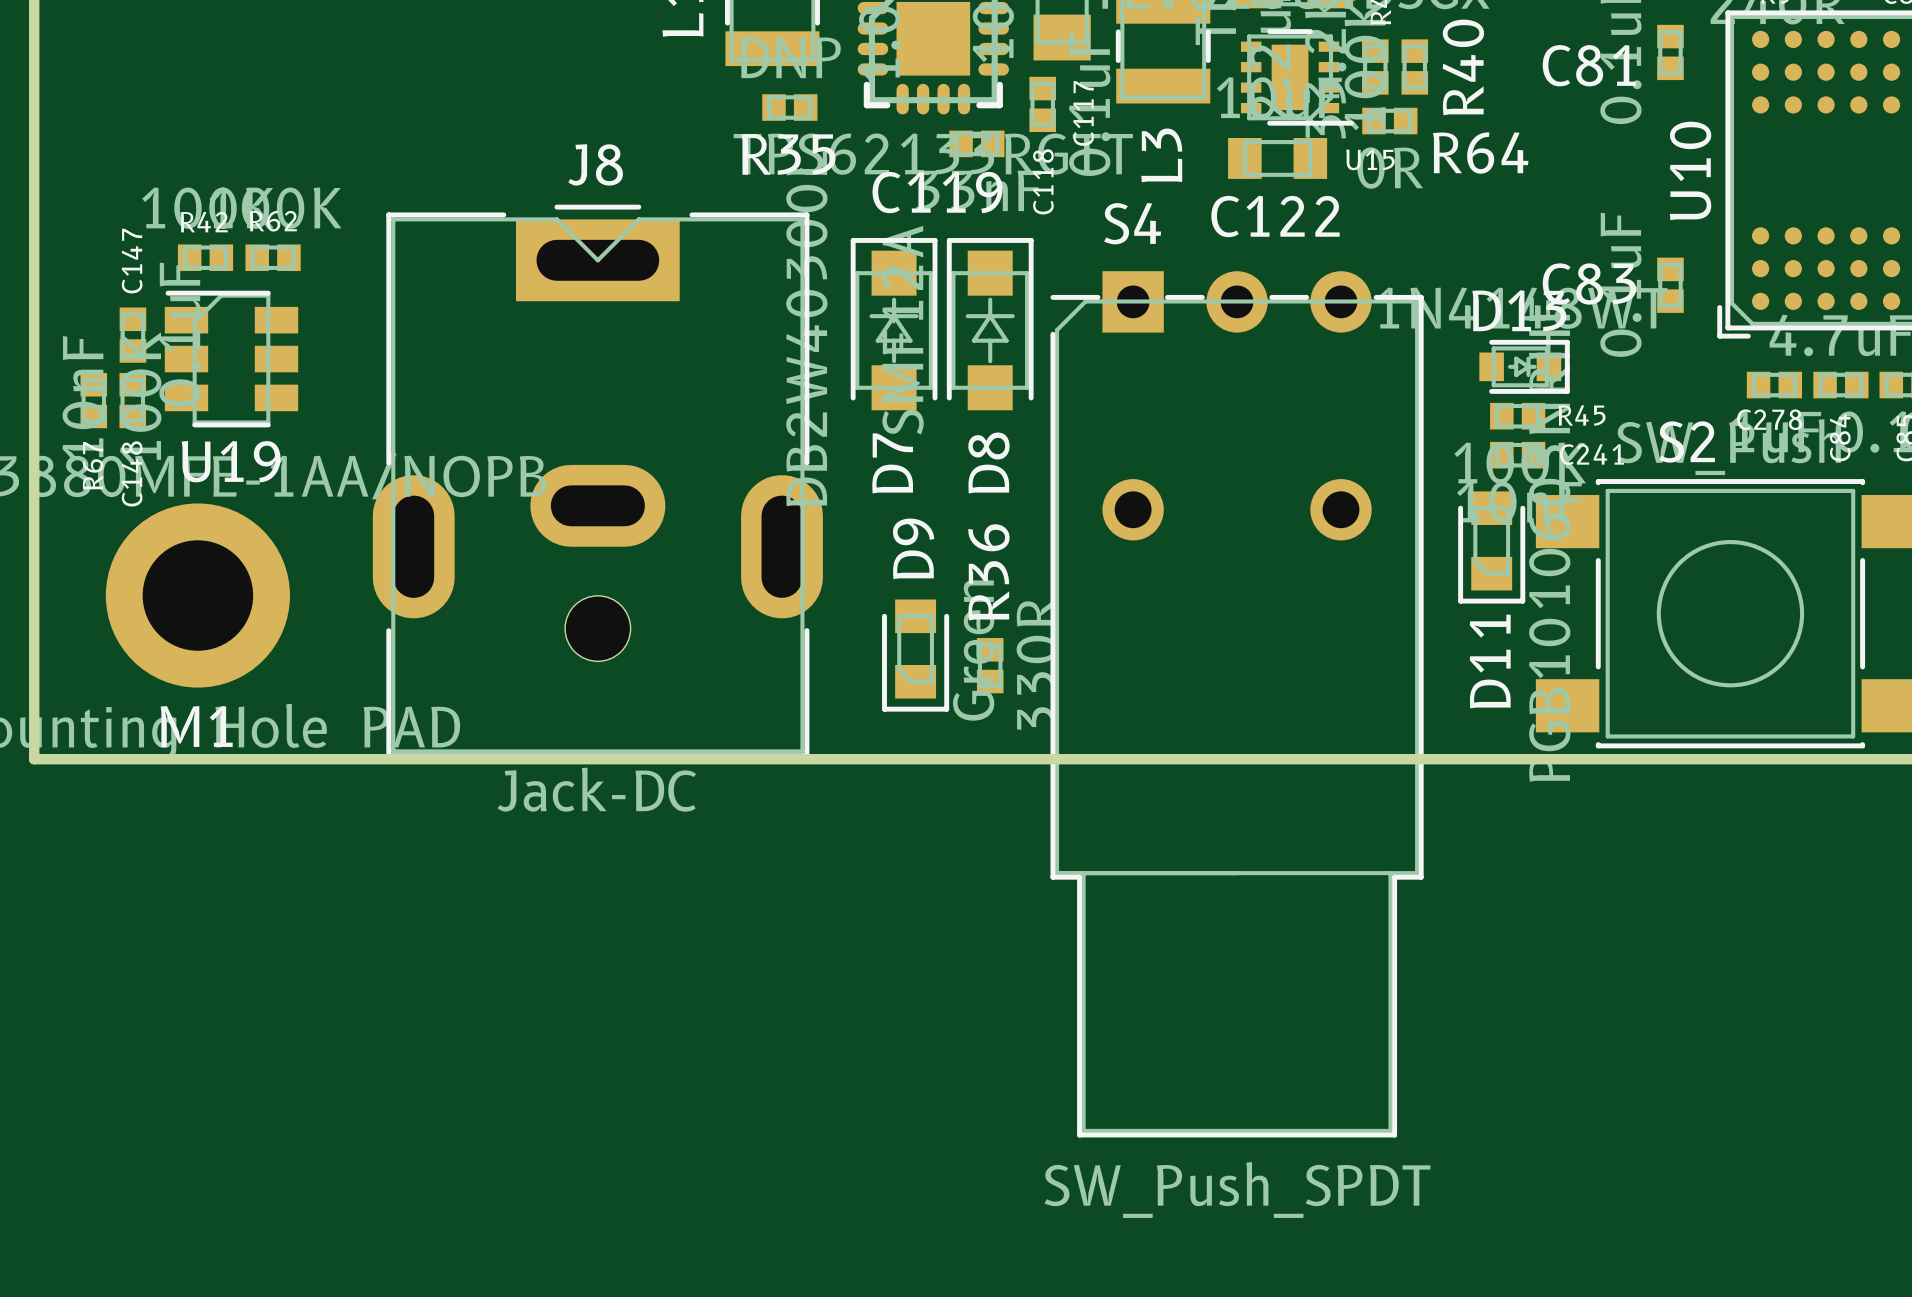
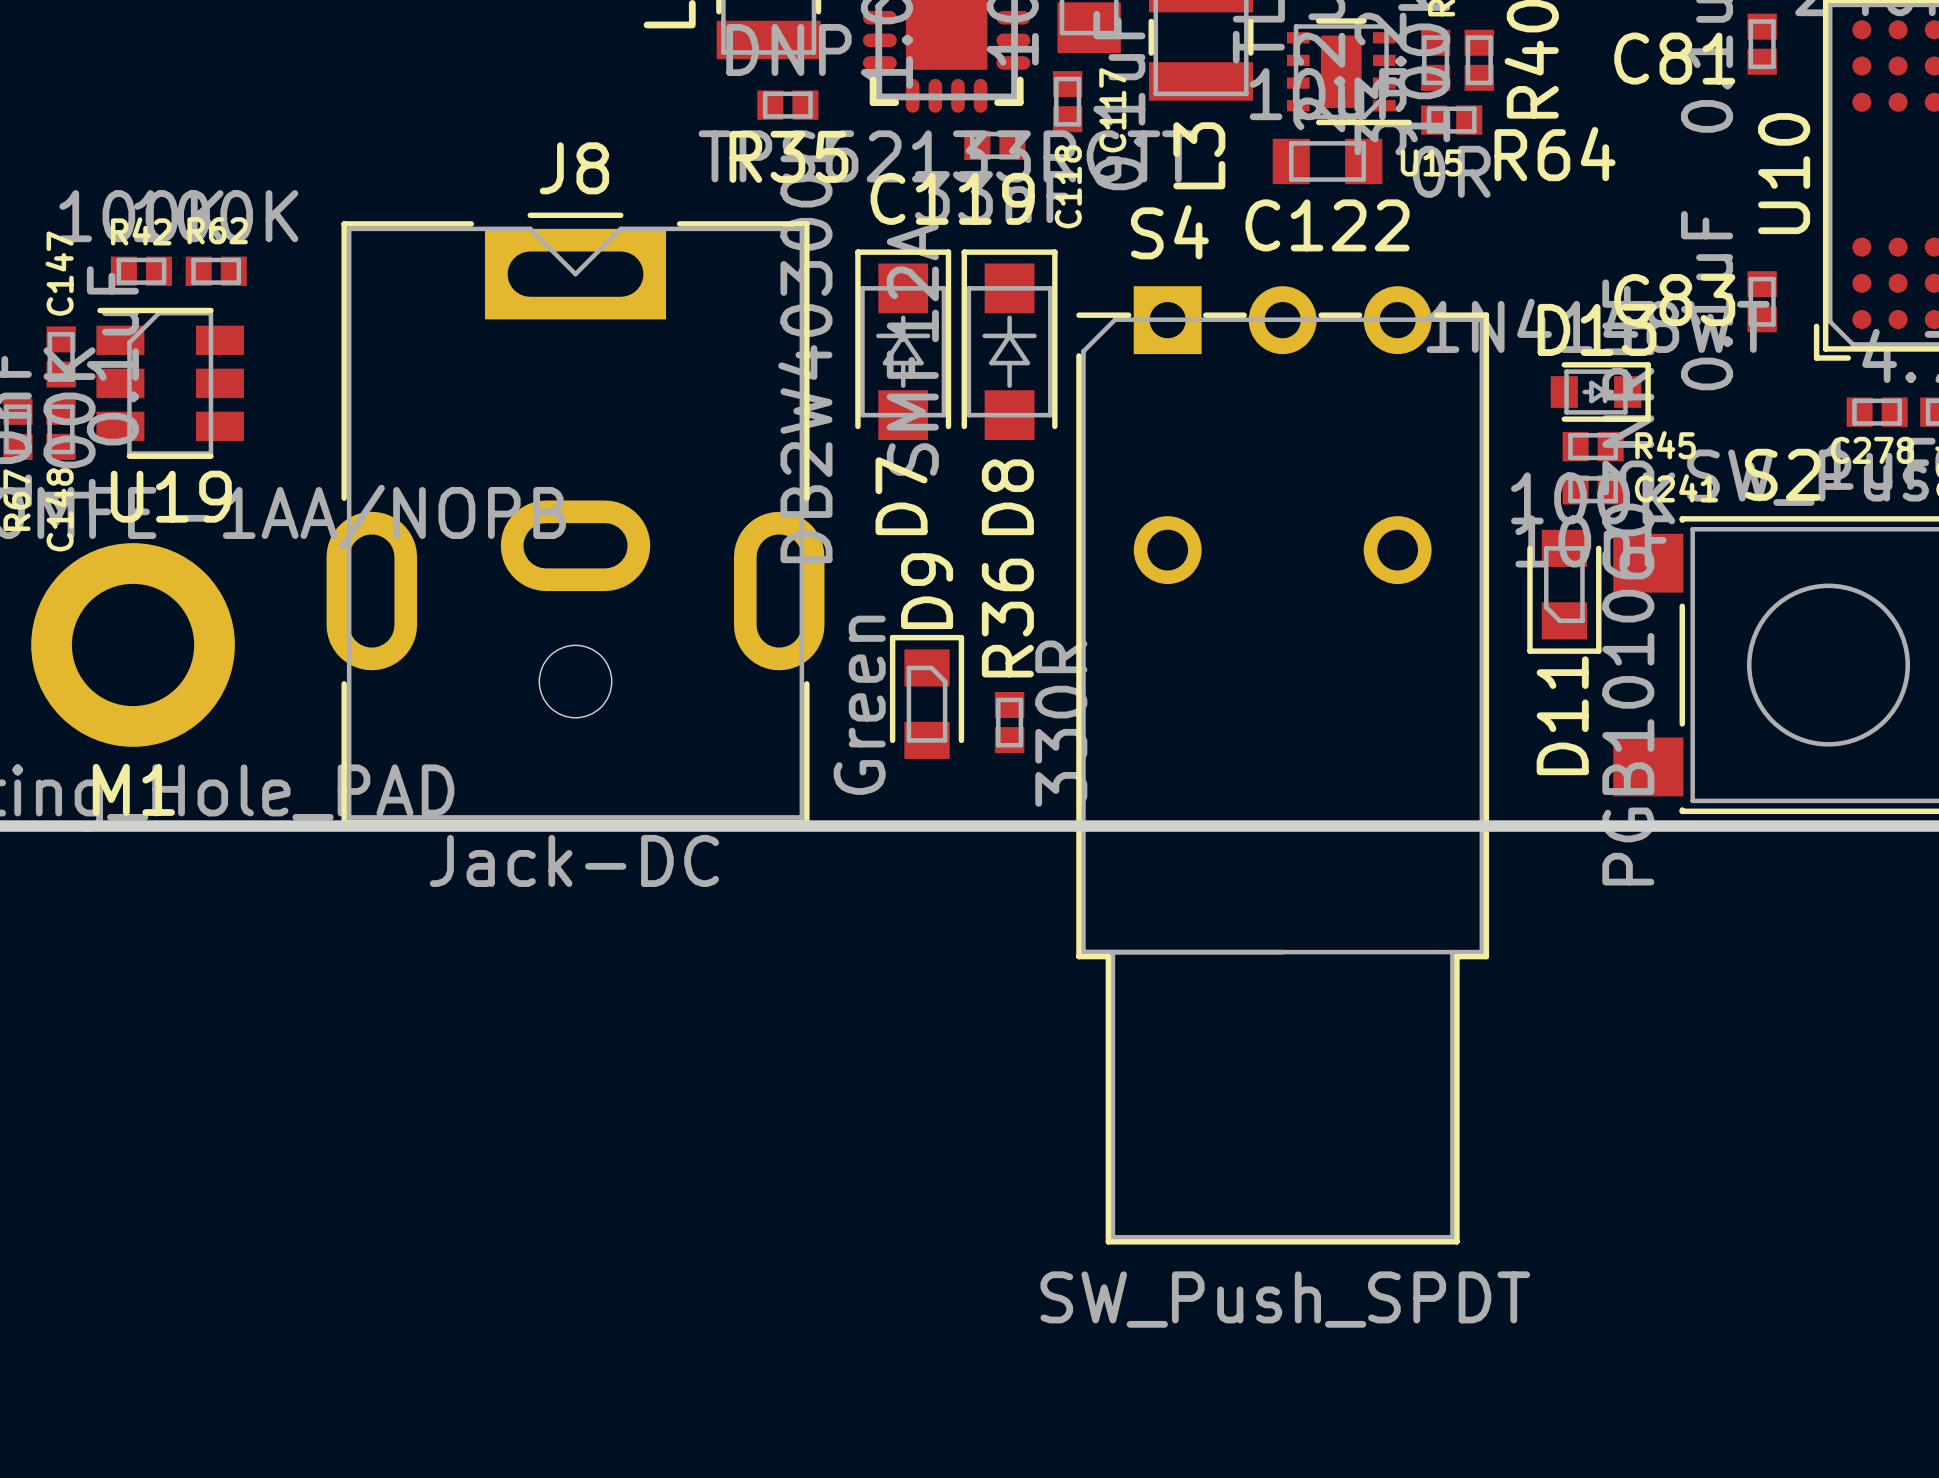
D9 rotation: 0° (915, 655) -> 180° (927, 696)

